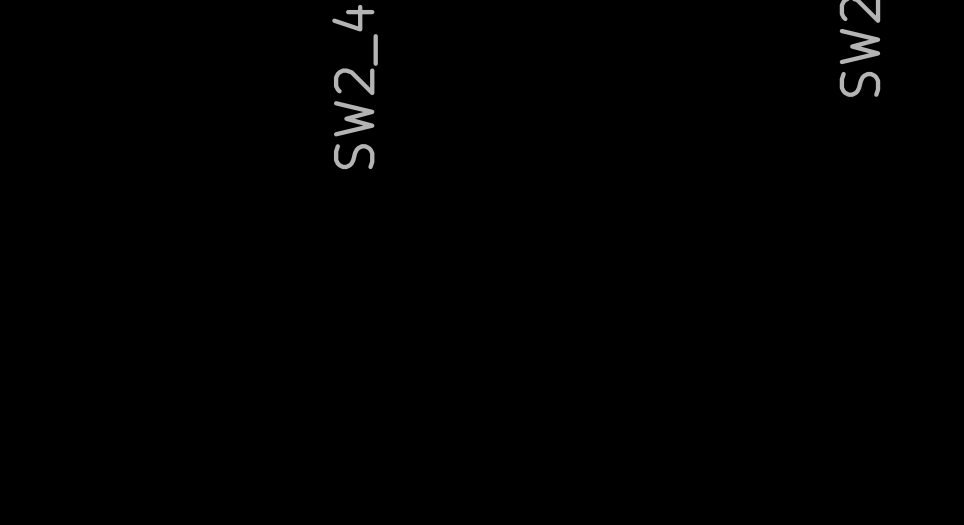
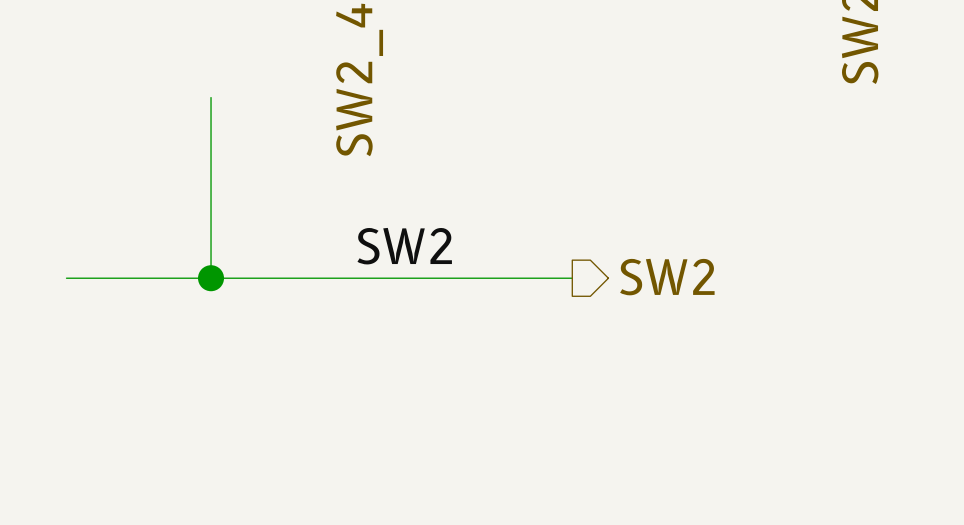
wire: none -> (211, 97) (211, 278)
label: none -> SW2 (404, 246)
hierarchical label: none -> SW2 (667, 277)
wire: none -> (66, 278) (572, 278)
junction: none -> (211, 278)

